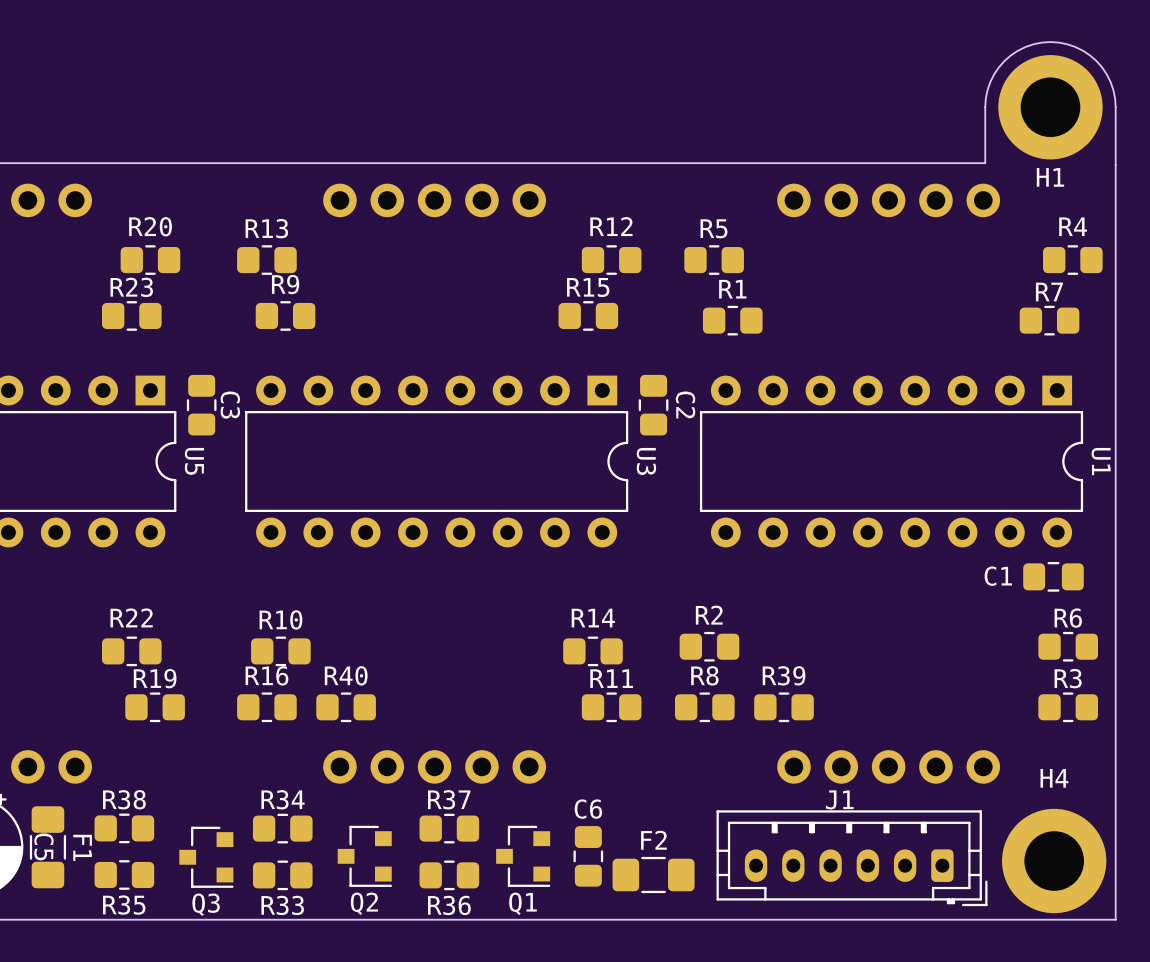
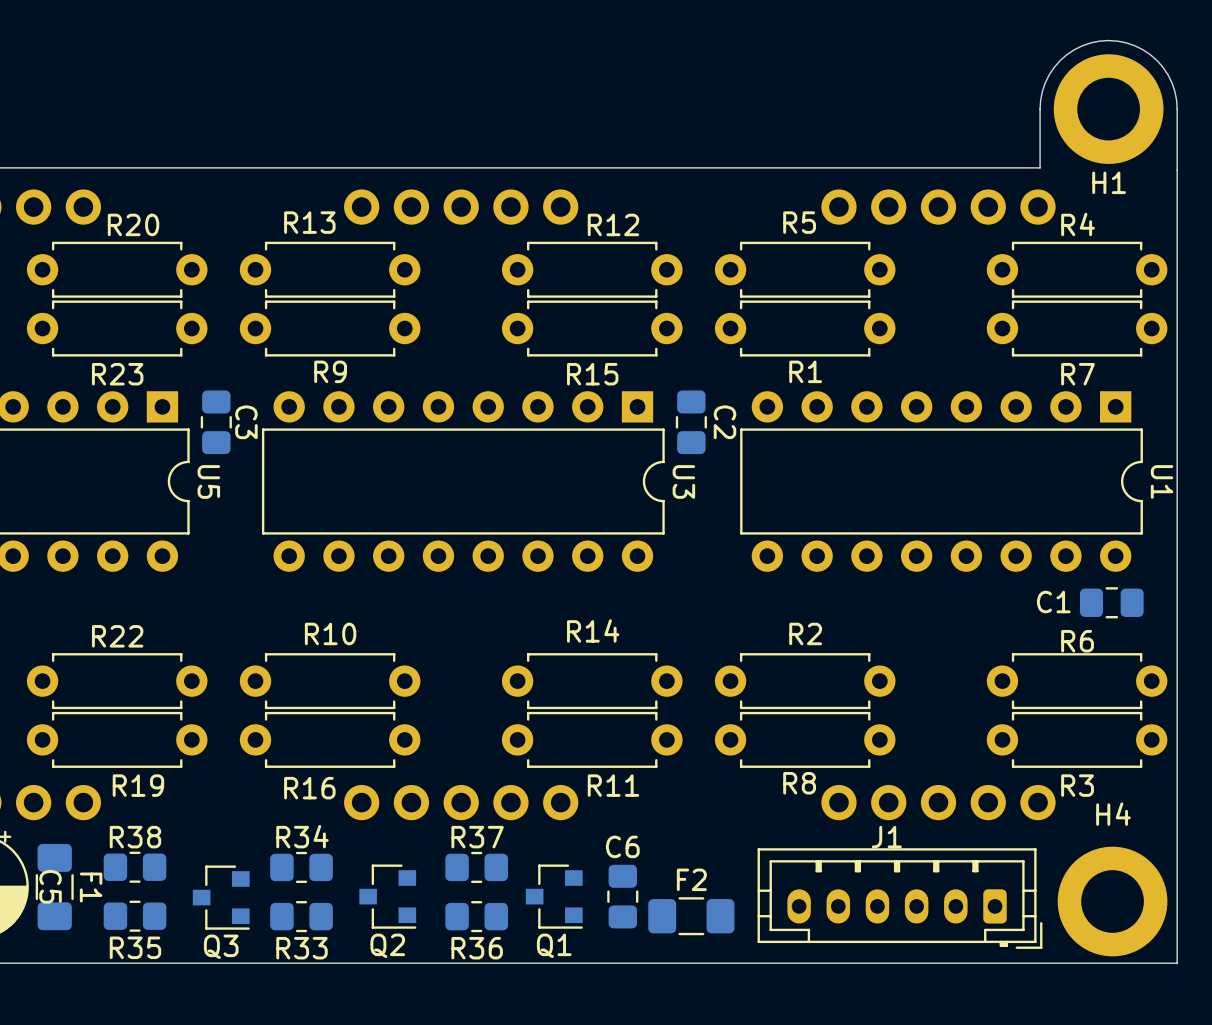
R20 footprint: [120, 245, 181, 275] -> [26, 241, 208, 298]
R13 footprint: [237, 245, 297, 275] -> [239, 241, 421, 298]
R12 footprint: [581, 245, 642, 275] -> [501, 241, 683, 298]
R5 footprint: [684, 245, 744, 275] -> [714, 241, 896, 298]
R4 footprint: [1043, 245, 1103, 275] -> [986, 241, 1168, 298]
R9 name position: R9 (285, 284) -> R9 (330, 371)
R23 name position: R23 (131, 287) -> R23 (117, 374)
R15 name position: R15 (588, 287) -> R15 (592, 374)
R1 name position: R1 (732, 289) -> R1 (805, 371)
R7 name position: R7 (1049, 291) -> R7 (1078, 374)
R23 footprint: [101, 301, 162, 331] -> [26, 300, 208, 357]
R9 footprint: [255, 301, 316, 331] -> [239, 300, 421, 357]
R15 footprint: [558, 301, 619, 331] -> [501, 300, 683, 357]
R1 footprint: [702, 305, 763, 336] -> [714, 300, 896, 357]
R7 footprint: [1019, 305, 1080, 336] -> [986, 300, 1168, 357]
R2 footprint: [679, 631, 740, 662] -> [714, 653, 896, 710]
R6 footprint: [1038, 631, 1098, 662] -> [986, 653, 1168, 710]
R22 footprint: [101, 636, 162, 667] -> [26, 653, 208, 710]
R10 footprint: [251, 636, 311, 667] -> [239, 653, 421, 710]
R14 footprint: [563, 636, 623, 667] -> [501, 653, 683, 710]
R16 name position: R16 (266, 675) -> R16 (309, 788)
R8 name position: R8 (704, 675) -> R8 (799, 783)
R19 name position: R19 (155, 678) -> R19 (138, 785)
R11 name position: R11 (611, 678) -> R11 (613, 785)
R3 name position: R3 (1068, 678) -> R3 (1077, 785)
R19 footprint: [125, 692, 185, 723] -> [26, 711, 208, 768]
R16 footprint: [237, 692, 297, 723] -> [239, 711, 421, 768]
R11 footprint: [581, 692, 642, 723] -> [501, 711, 683, 768]
R8 footprint: [674, 692, 735, 723] -> [714, 711, 896, 768]
R3 footprint: [1038, 692, 1098, 723] -> [986, 711, 1168, 768]
R40: (346, 707) -> none
R39: (784, 707) -> none

